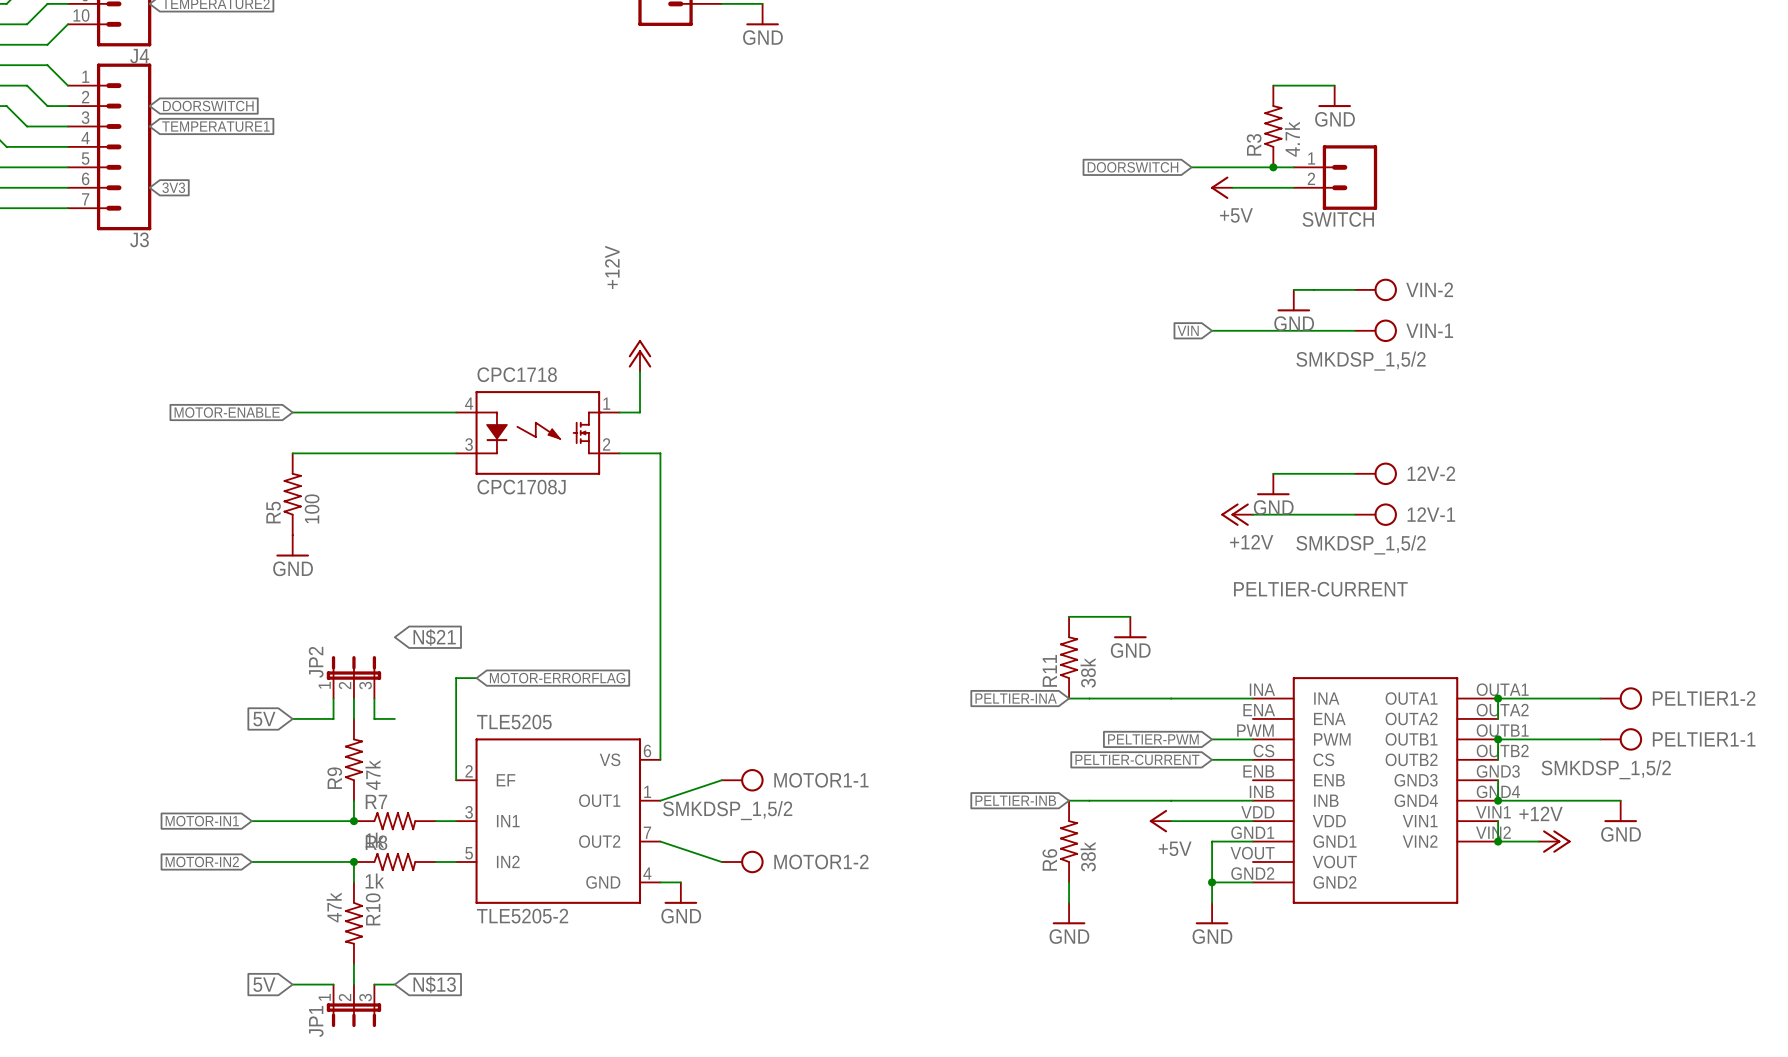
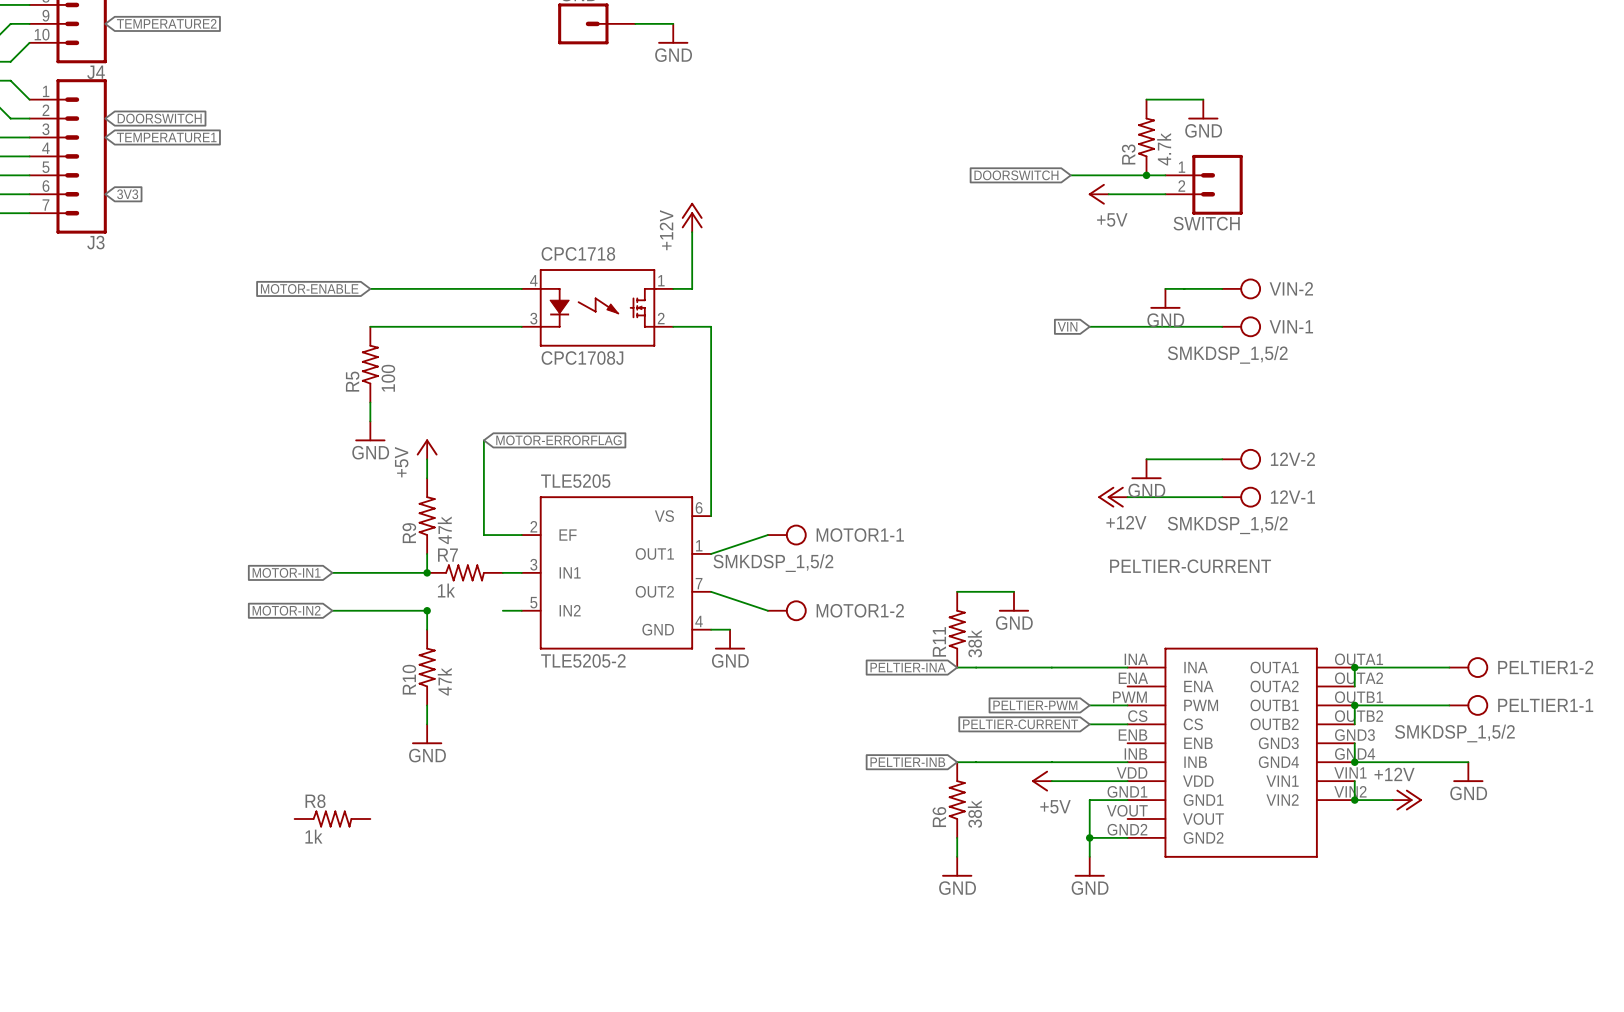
power symbol: none -> +12V (692, 217)
wire: none -> (692, 232) (692, 288) (673, 288)
wire: none -> (673, 326) (711, 326) (711, 516)
power symbol: +12V (640, 355) -> none
wire: (640, 371) (640, 412) (619, 412) -> none
global label position: MOTOR-ENABLE (227, 412) -> MOTOR-ENABLE (309, 288)
wire: (292, 412) (456, 412) -> (370, 288) (521, 288)
wire: none -> (370, 402) (370, 421)
CPC1718 position: (537, 432) -> (597, 307)
power symbol: none -> GND (370, 431)
wire: (292, 453) (456, 453) -> (370, 326) (521, 326)
wire: none -> (483, 440) (483, 535) (521, 535)
wire: (619, 453) (660, 453) (660, 759) -> none
global label: none -> MOTOR-ERRORFLAG (558, 440)
power symbol: none -> +5V (427, 449)
wire: none -> (427, 459) (427, 478)
R5 position: (292, 494) -> (370, 364)
power symbol: GND (292, 545) -> none
wire: none -> (767, 535) (711, 553)
wire: none -> (427, 553) (427, 572) (332, 572)
global label: none -> MOTOR-IN1 (286, 572)
junction: none -> (427, 572)
wire: none -> (502, 572) (521, 572)
wire: none -> (711, 591) (767, 610)
wire: none -> (332, 610) (427, 610) (427, 629)
global label: N$21 (434, 637) -> MOTOR-IN2 (286, 610)
junction: none -> (427, 610)
wire: none -> (502, 610) (521, 610)
wire: none -> (711, 629) (730, 629)
power symbol: none -> GND (730, 639)
JP2: (353, 677) -> none
wire: (476, 678) (456, 678) (456, 780) -> none
global label: MOTOR-ERRORFLAG (557, 678) -> none
wire: (333, 698) (333, 718) (292, 718) -> none
wire: (353, 698) (353, 718) -> (427, 705) (427, 724)
wire: (374, 698) (374, 718) (394, 718) -> none
global label: 5V (264, 719) -> none
R9 position: (353, 759) -> (427, 516)
power symbol: none -> GND (427, 734)
wire: (721, 780) (660, 800) -> none
MOTOR1-1 position: (742, 780) -> (787, 535)
wire: (353, 800) (353, 821) (251, 821) -> none
global label: MOTOR-IN1 (202, 821) -> none
junction: (353, 821) -> none
R7 position: (394, 821) -> (465, 572)
wire: (435, 821) (456, 821) -> none
TLE5205 position: (558, 821) -> (616, 572)
wire: (660, 841) (721, 861) -> none
global label: MOTOR-IN2 (202, 861) -> none
wire: (251, 861) (353, 861) (353, 882) -> none
junction: (353, 861) -> none
wire: (435, 861) (456, 861) -> none
MOTOR1-2 position: (742, 861) -> (787, 610)
wire: (660, 882) (680, 882) -> none
power symbol: GND (680, 893) -> none
R10 rotation: 0° (353, 923) -> 180° (427, 667)
R10 position: (353, 923) -> (427, 667)
wire: (353, 964) (353, 984) -> none
global label: 5V (264, 984) -> none
wire: (292, 984) (333, 984) -> none
wire: (374, 984) (394, 984) -> none
global label: N$13 (434, 984) -> none
JP1: (353, 1005) -> none

